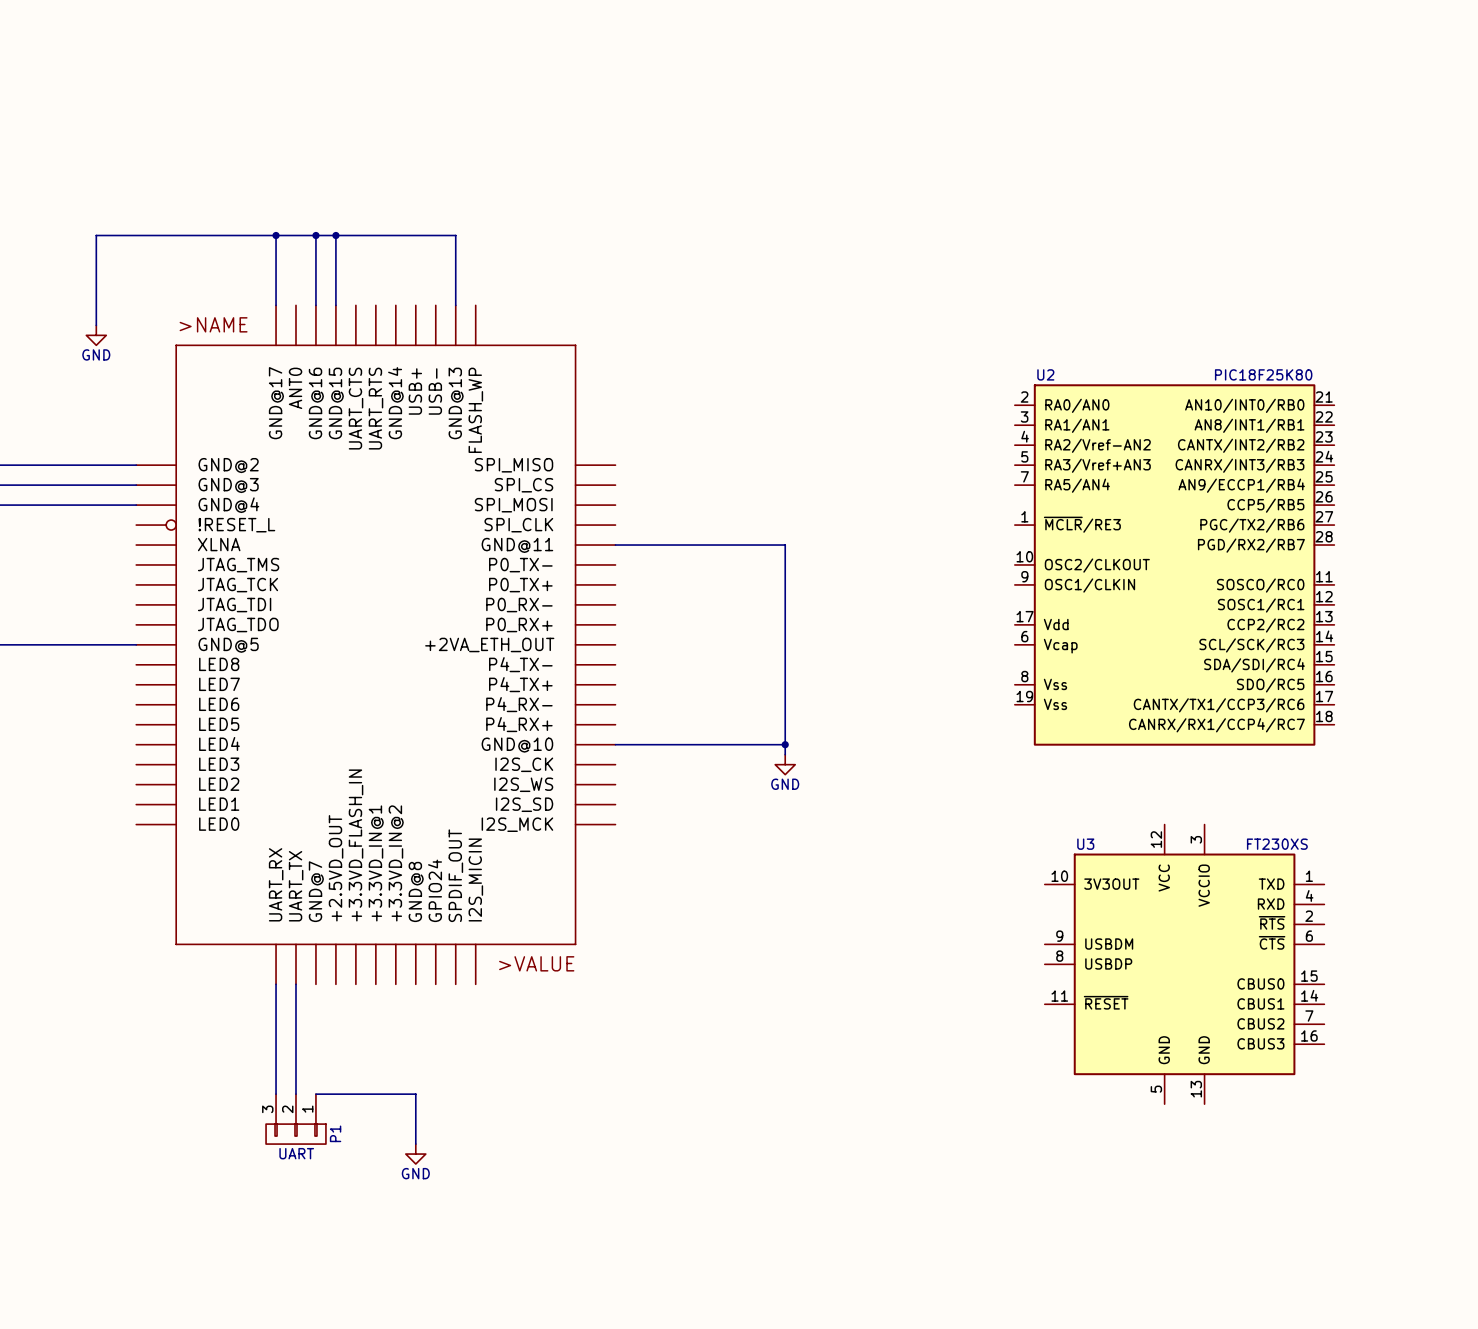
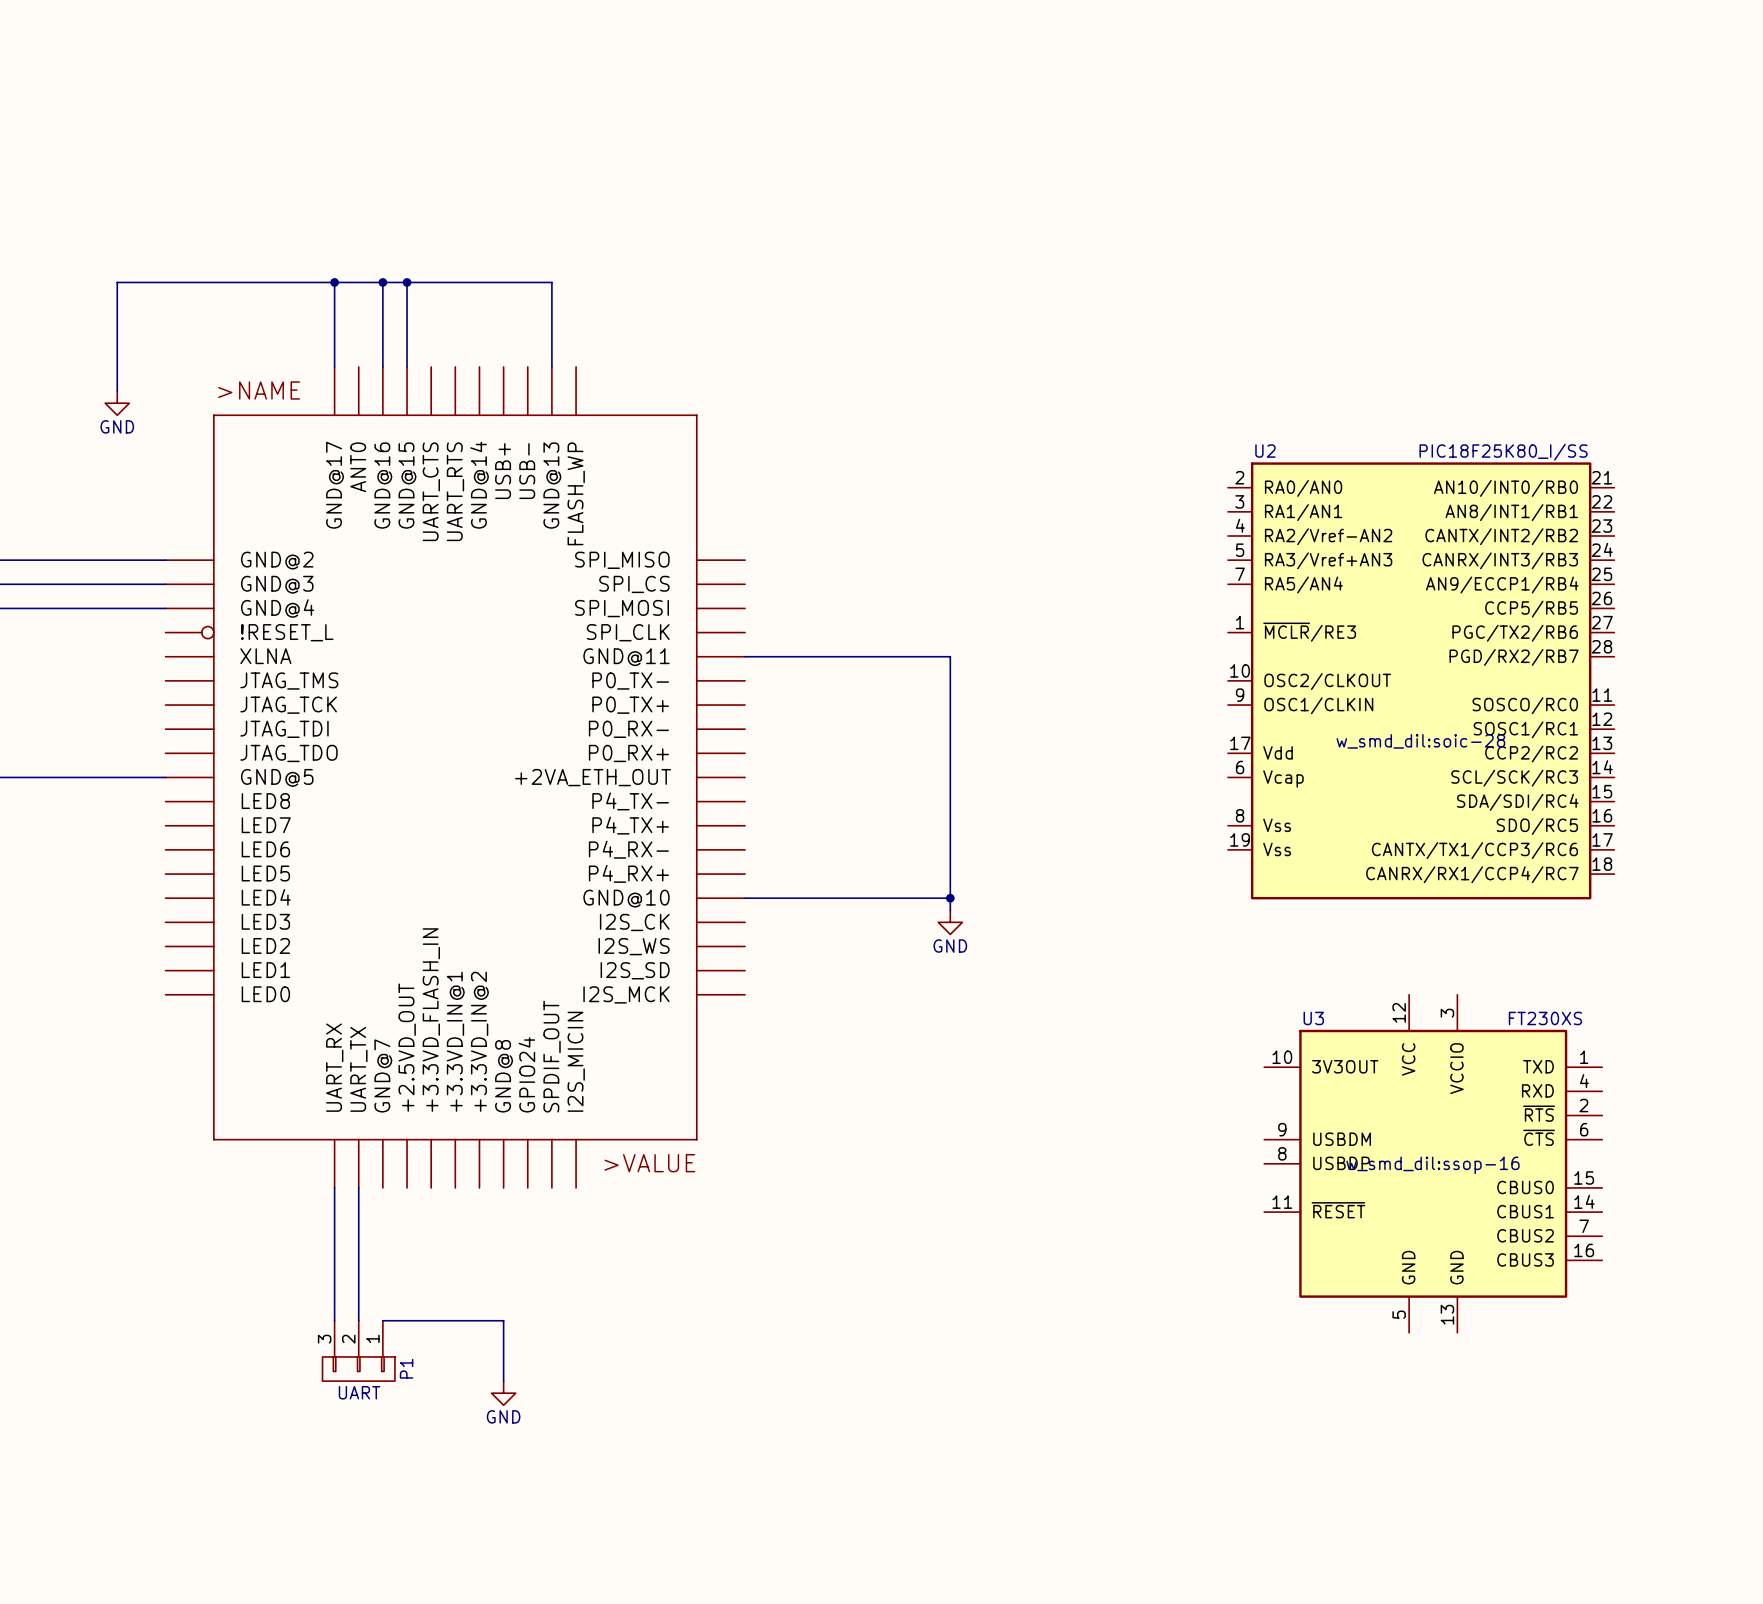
U2 value: PIC18F25K80 (1263, 374) -> PIC18F25K80_I/SS (1503, 452)
U2 text: none -> w_smd_dil:soic-28 (1420, 741)
U3 text: none -> w_smd_dil:ssop-16 (1432, 1165)

